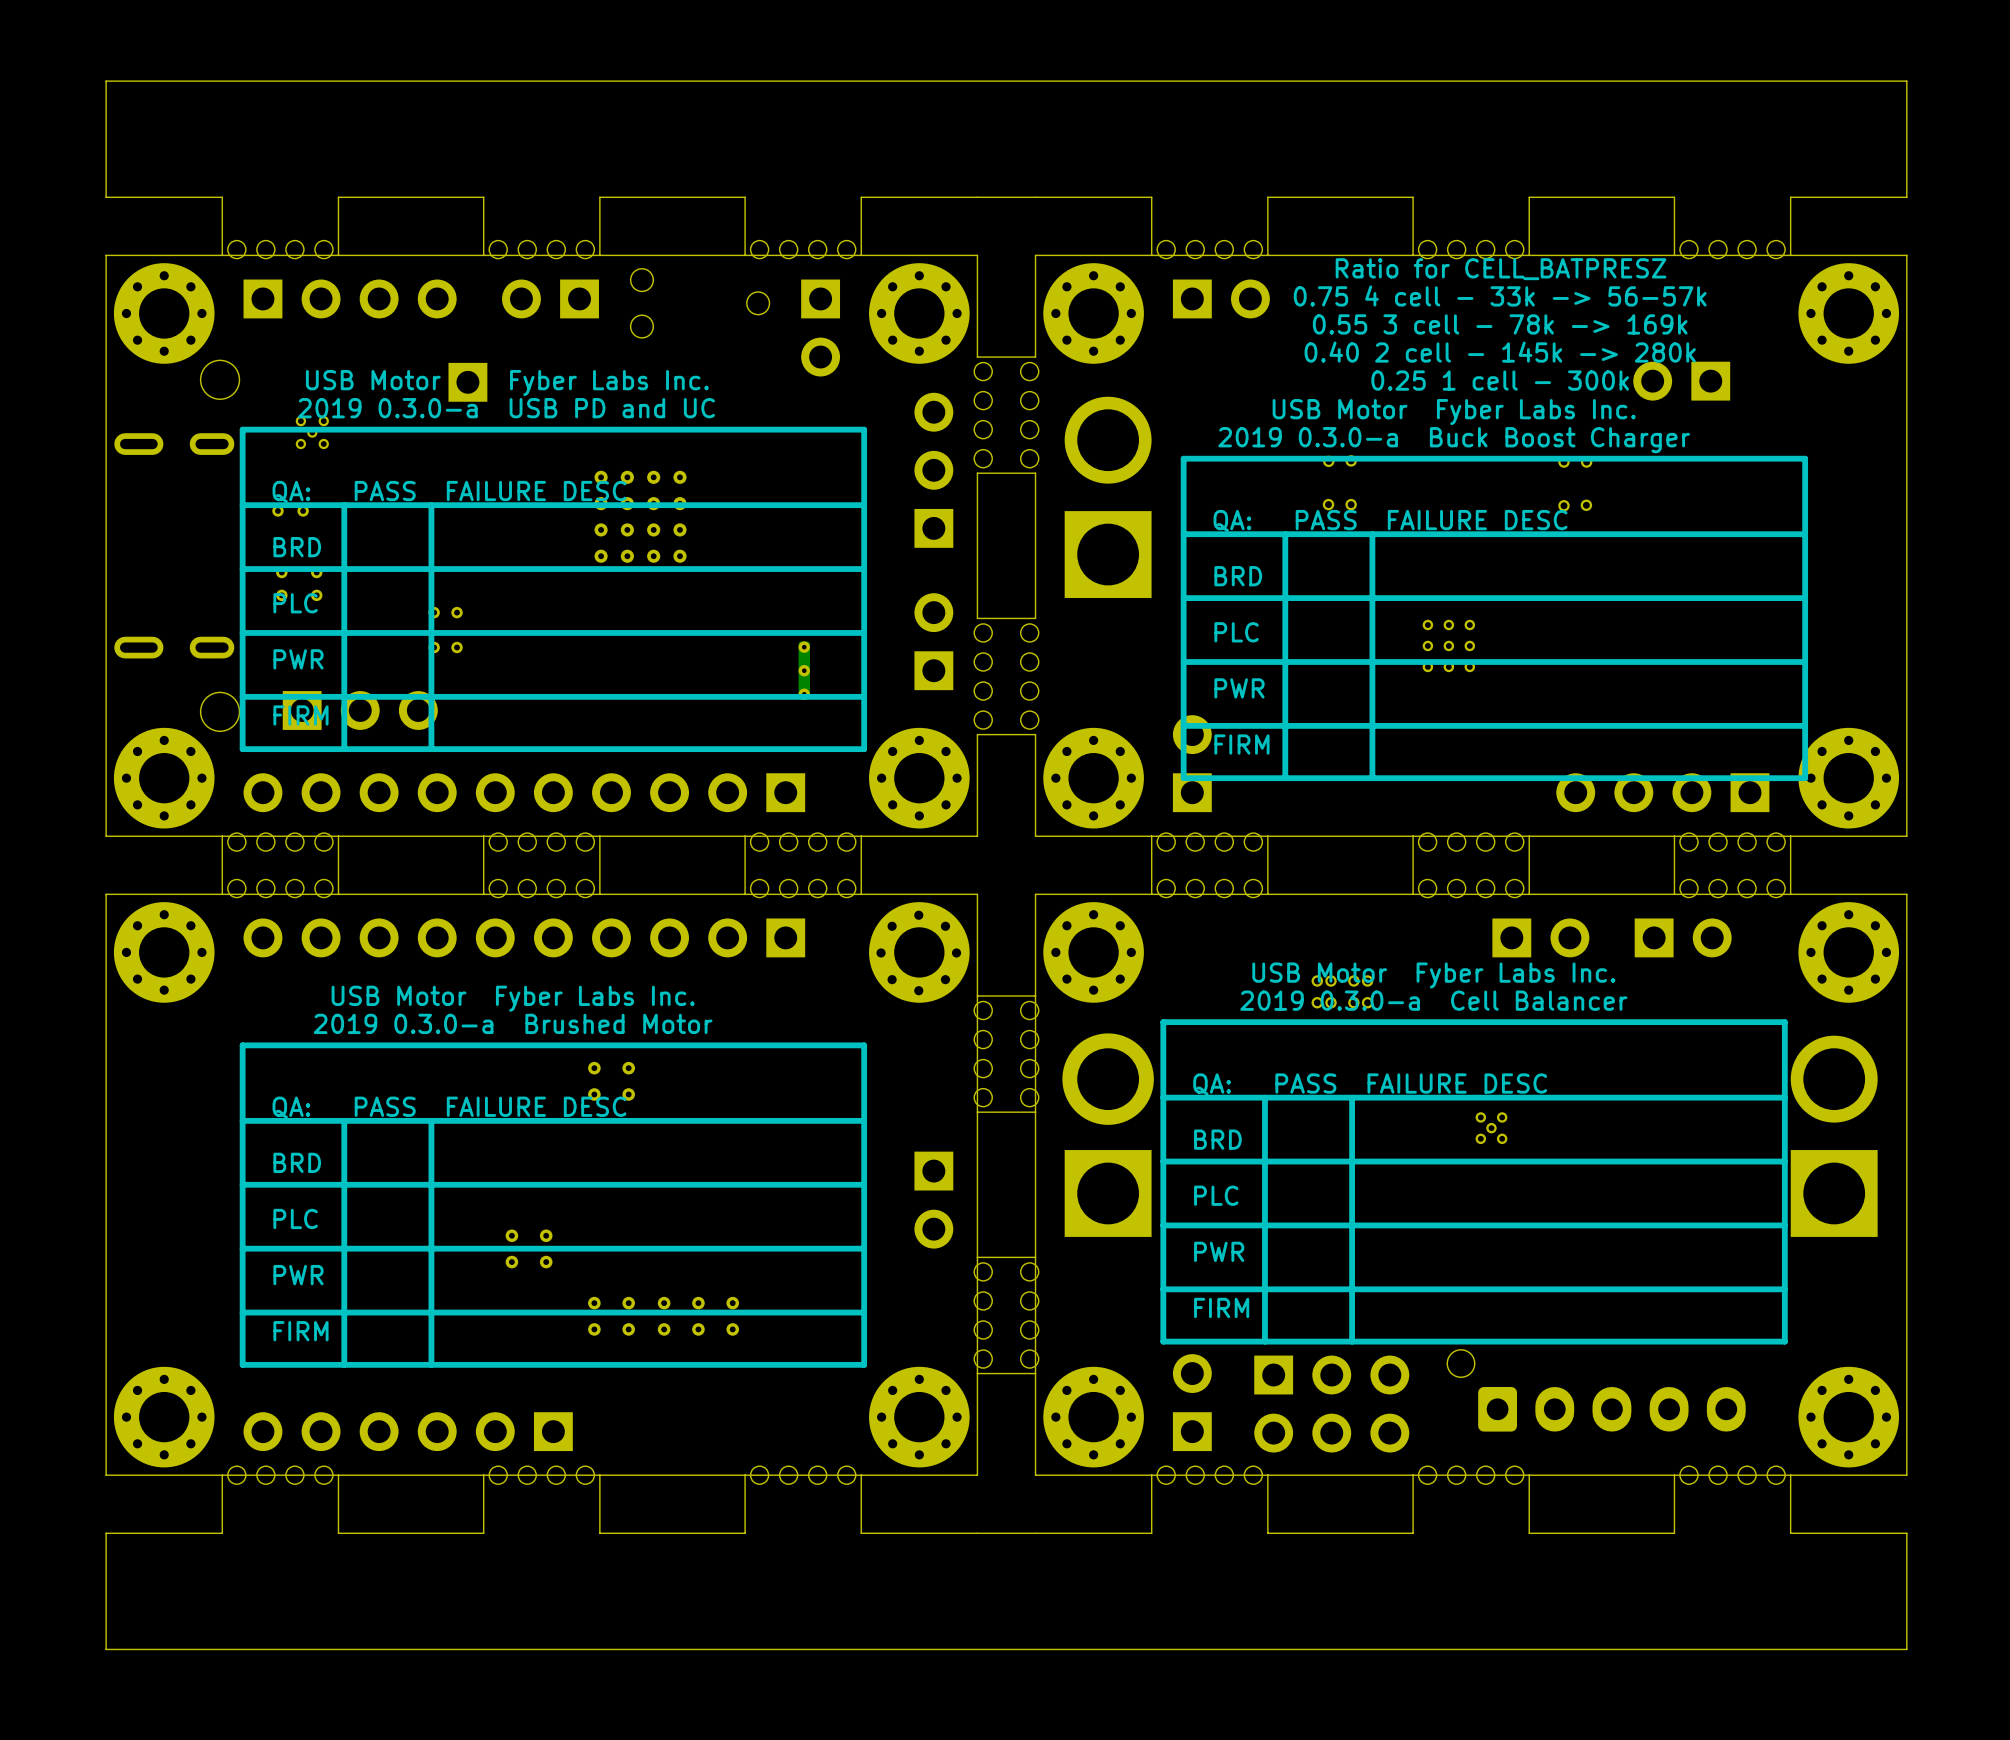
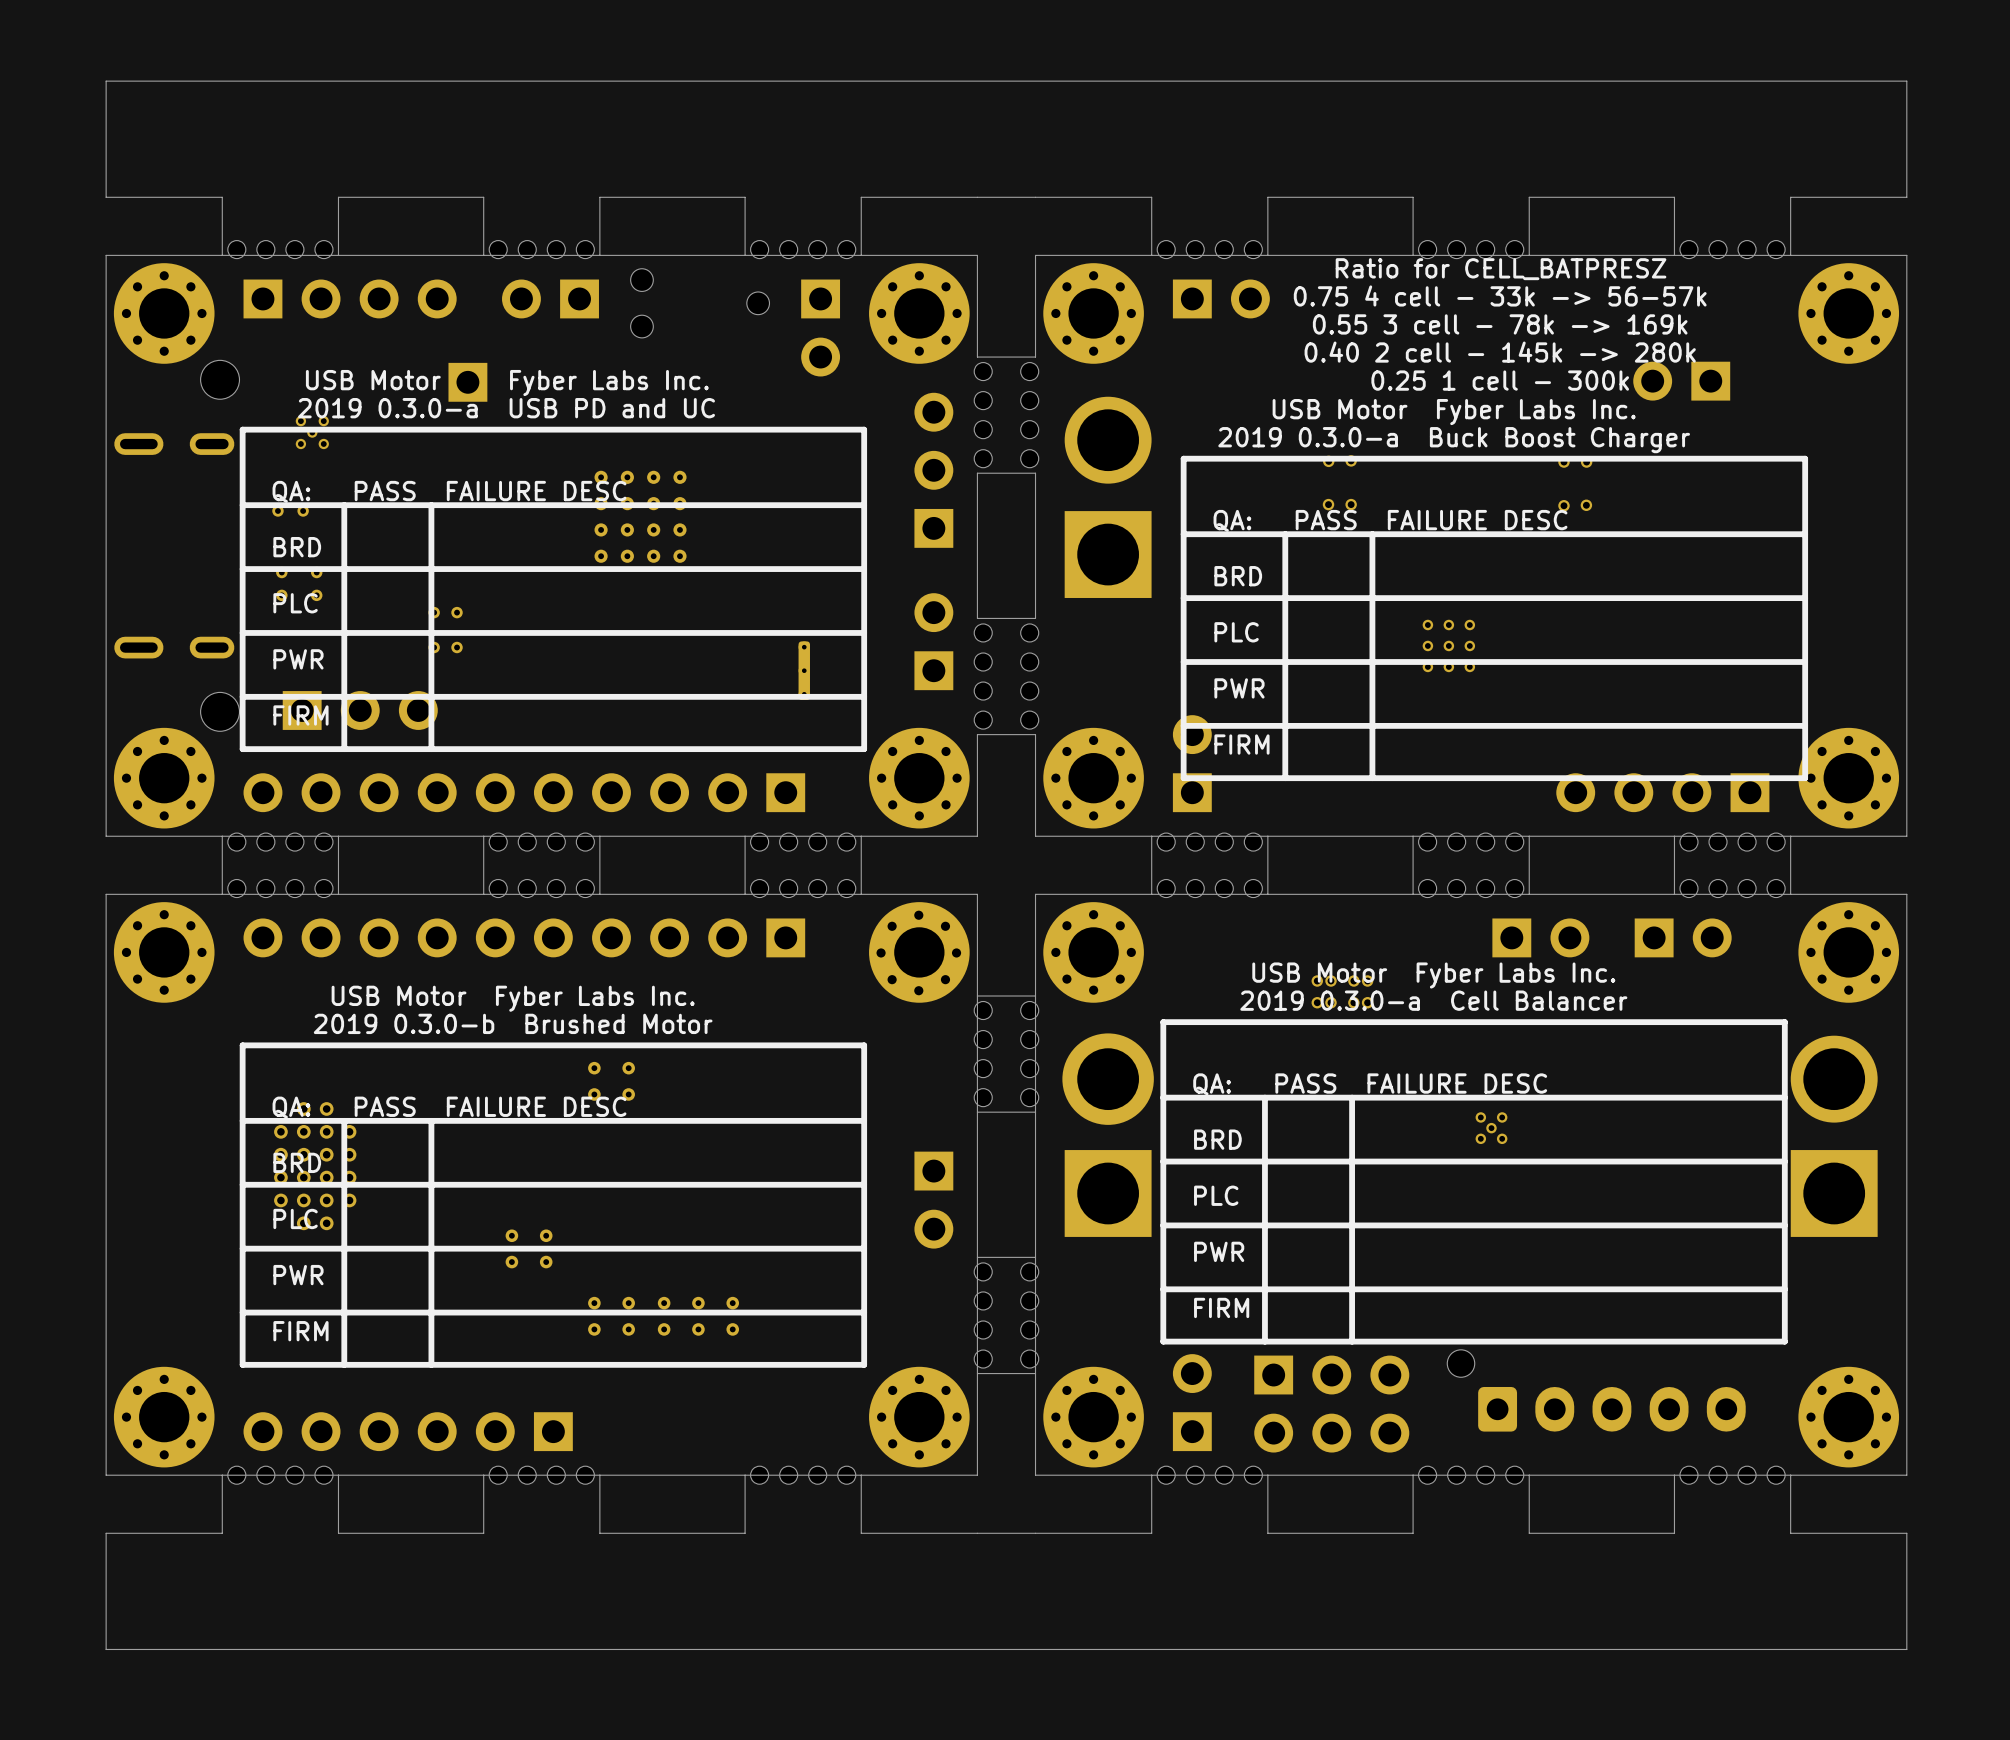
text: 2019 0.3.0-a Brushed Motor (513, 1023) -> 2019 0.3.0-b Brushed Motor (513, 1023)
part: none -> (315, 1166)

